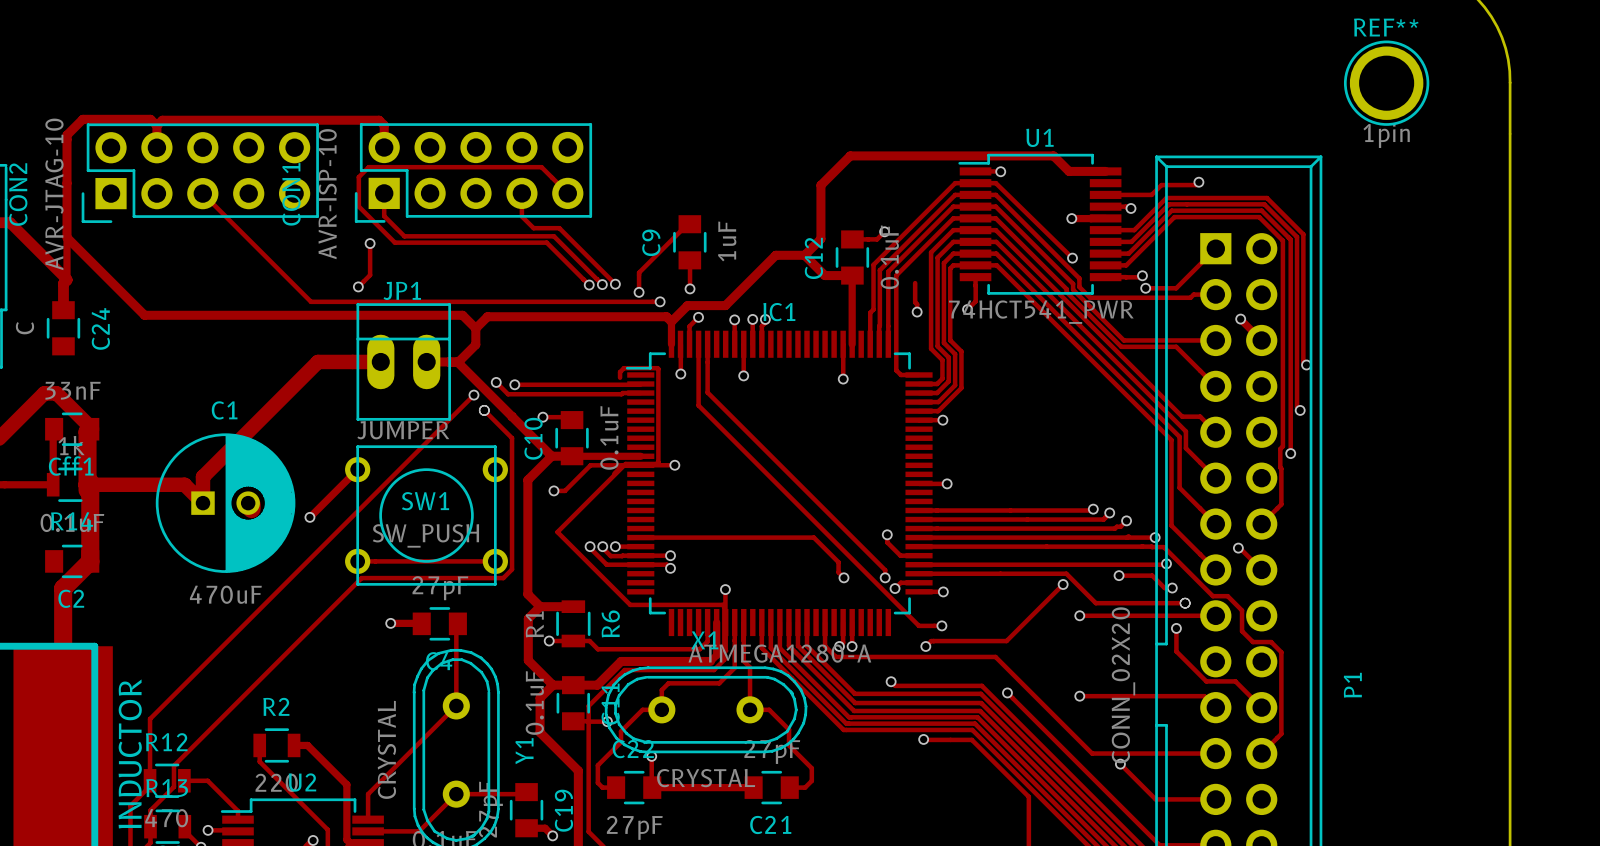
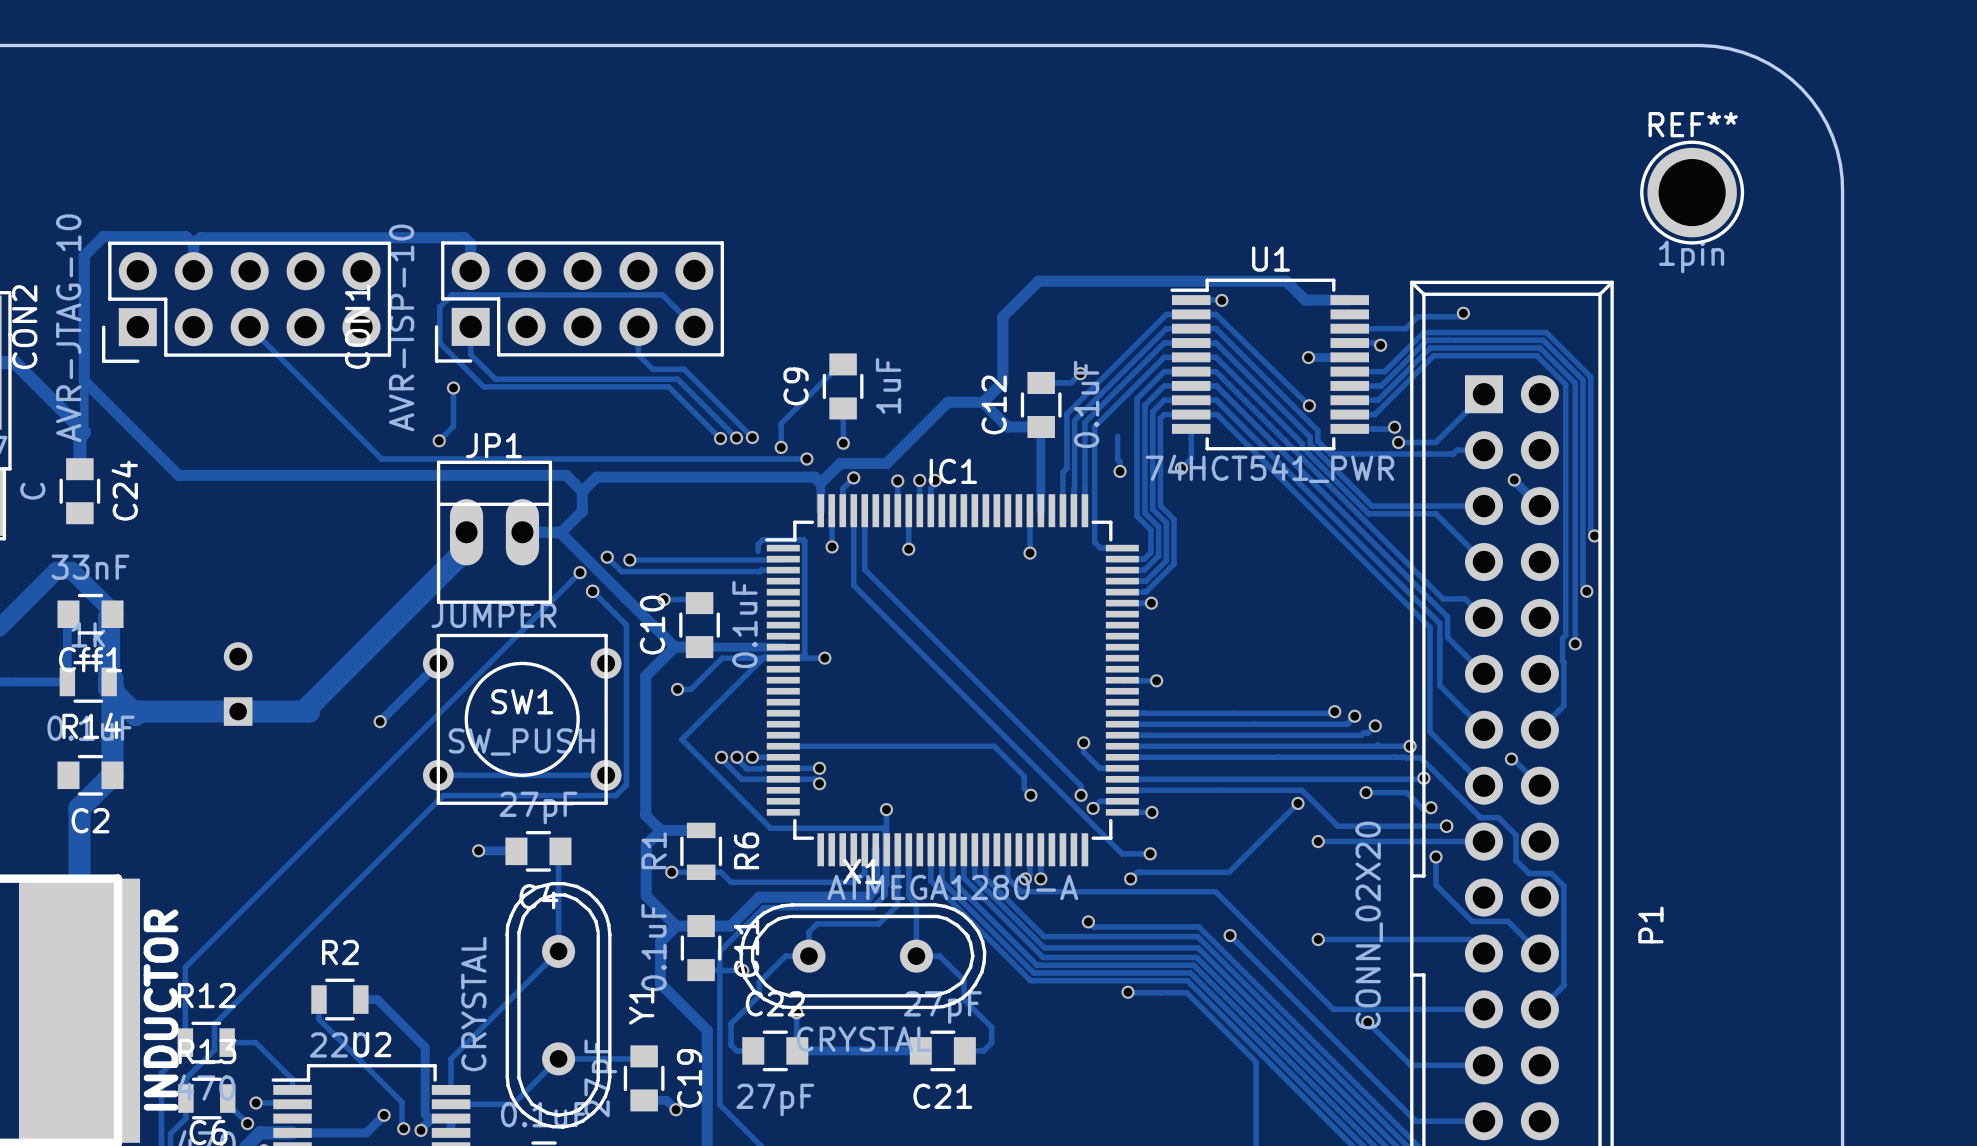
track: (380, 361) (317, 361) (203, 476) (203, 503) (184, 484) (87, 484) -> none
track: none -> (466, 548) (309, 706)
track: none -> (109, 688) (135, 714) (138, 711) (309, 711)
C1 side: top (225, 503) -> bottom (238, 684)

